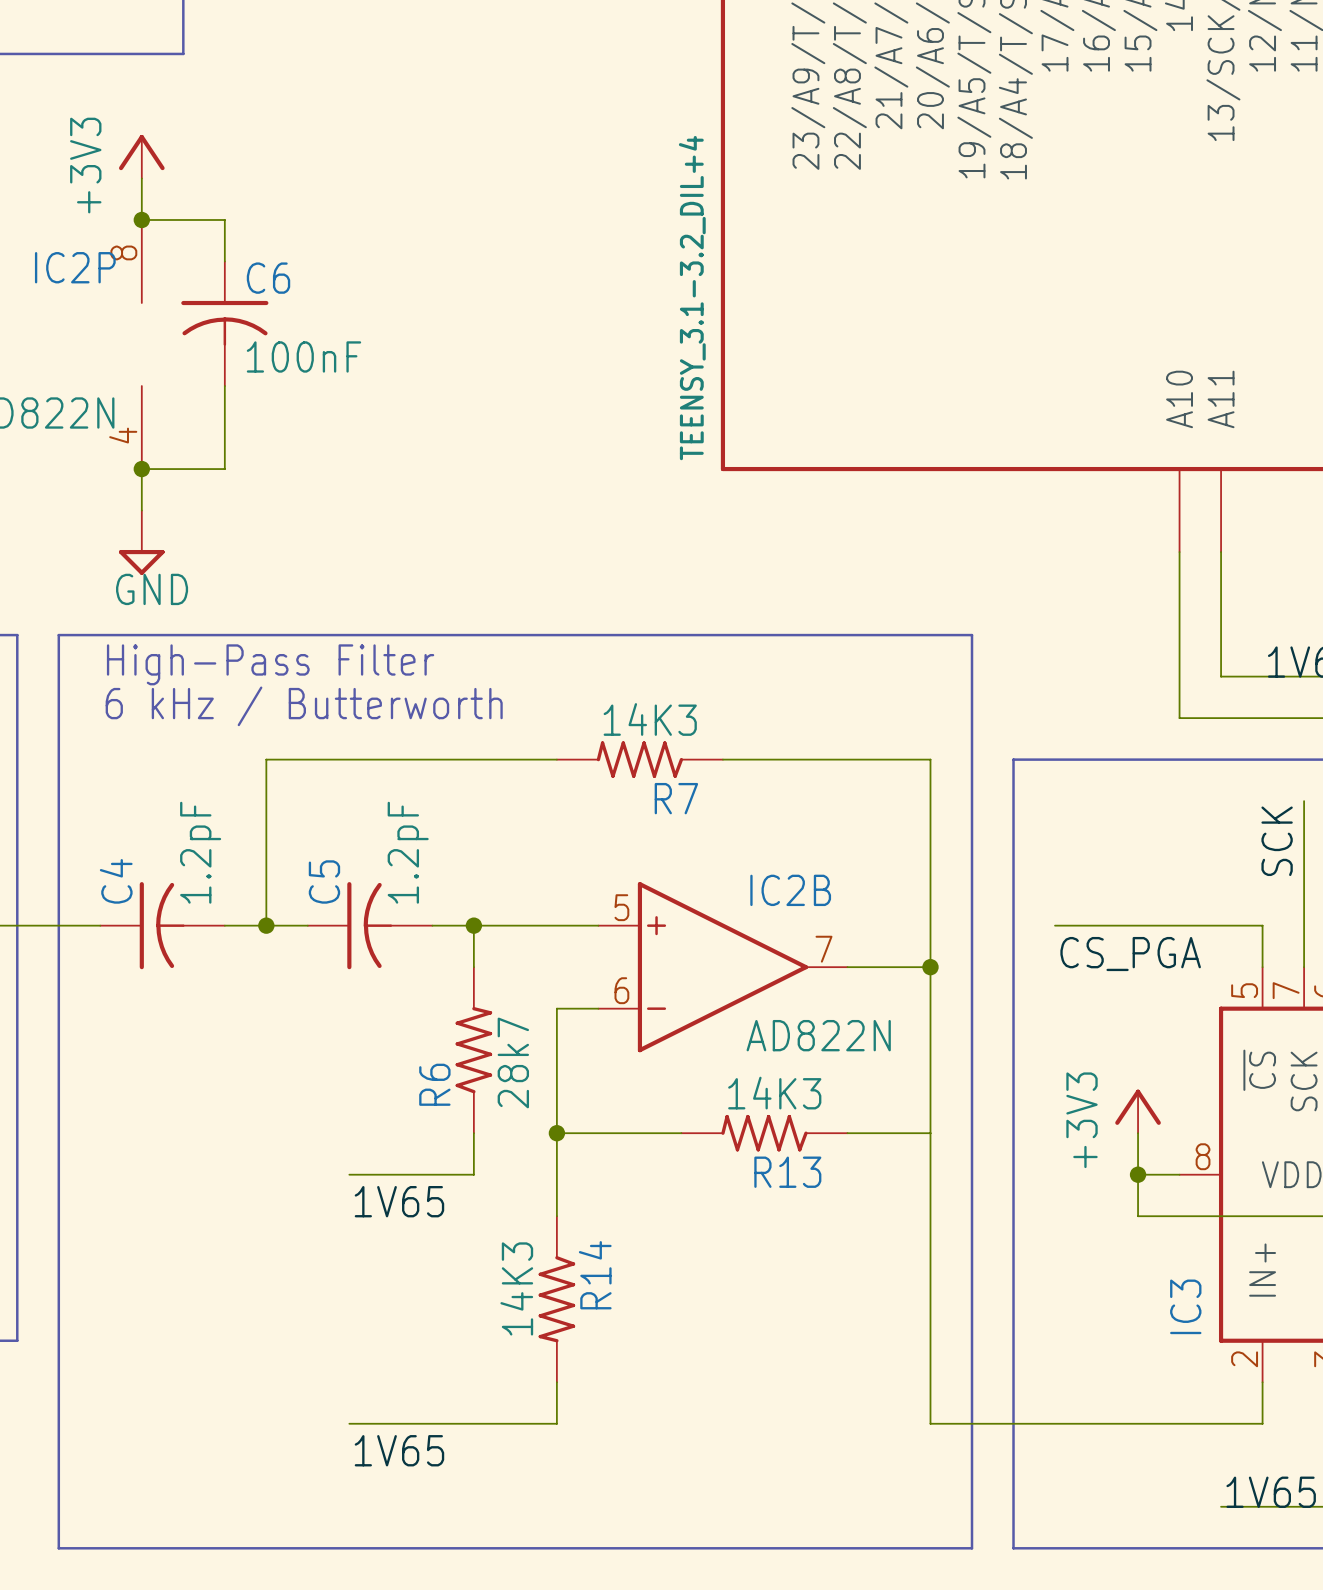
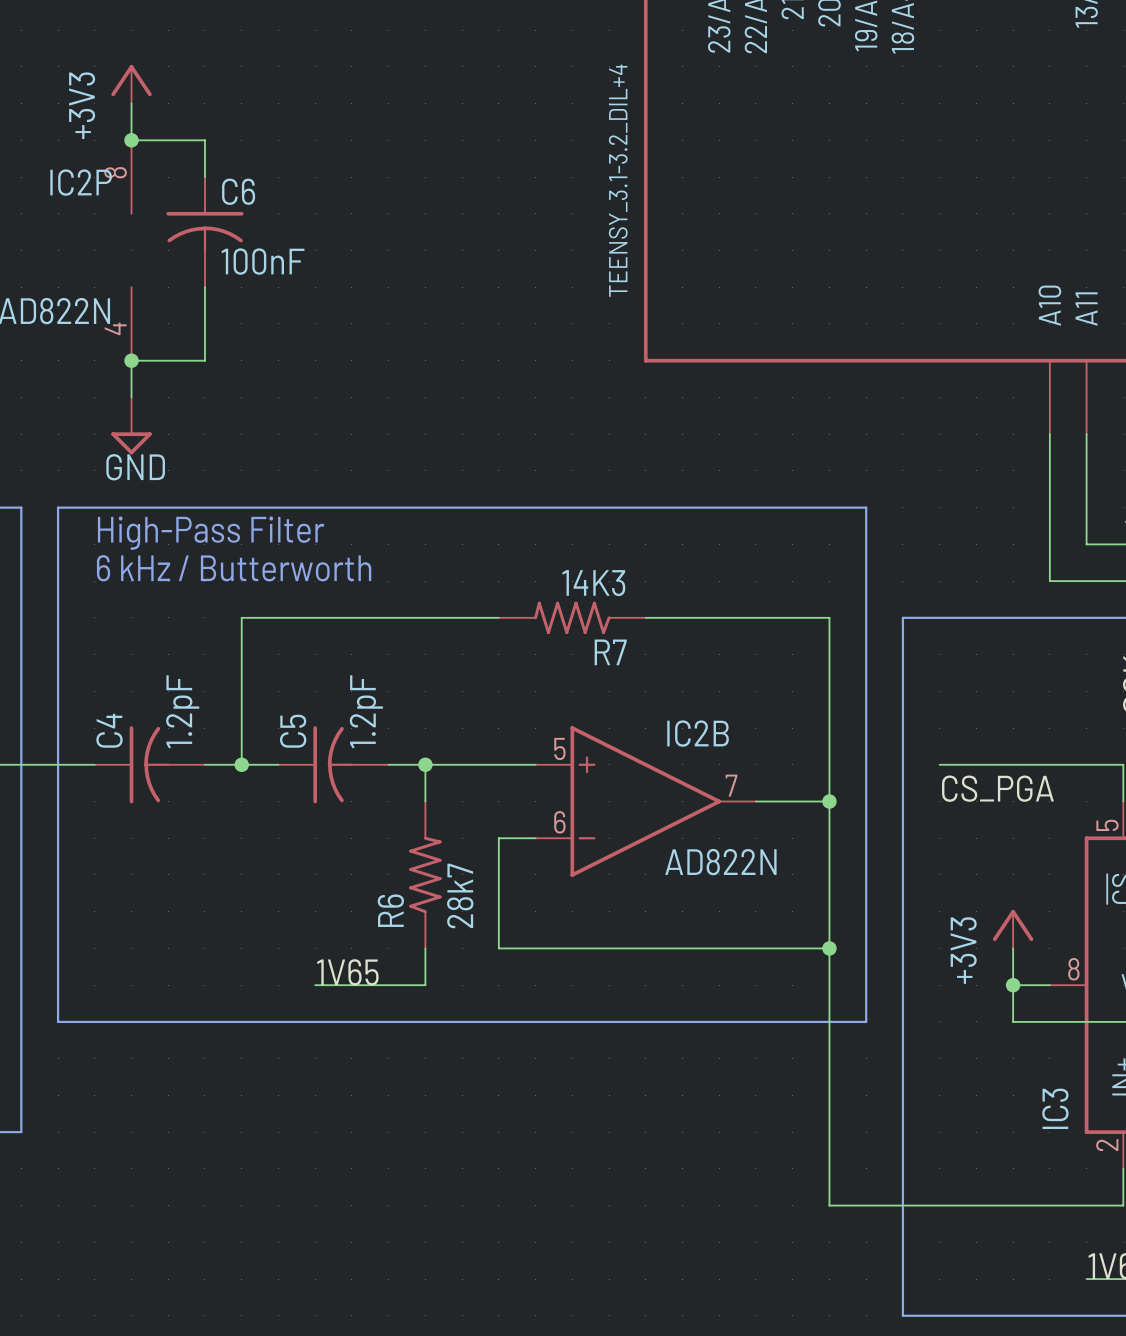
wire: (556, 1133) (556, 1216) -> none
junction: (556, 1133) -> none
R13: 14K3 (764, 1133) -> none
junction: none -> (829, 948)
label position: 1V65 (399, 1201) -> 1V65 (347, 972)
line: (58, 1216) (58, 1548) (972, 1548) (972, 1216) -> (58, 1021) (866, 1021)
R14: 14K3 (556, 1299) -> none
wire: (556, 1382) (556, 1423) (349, 1423) -> none
label: 1V65 (399, 1450) -> none

